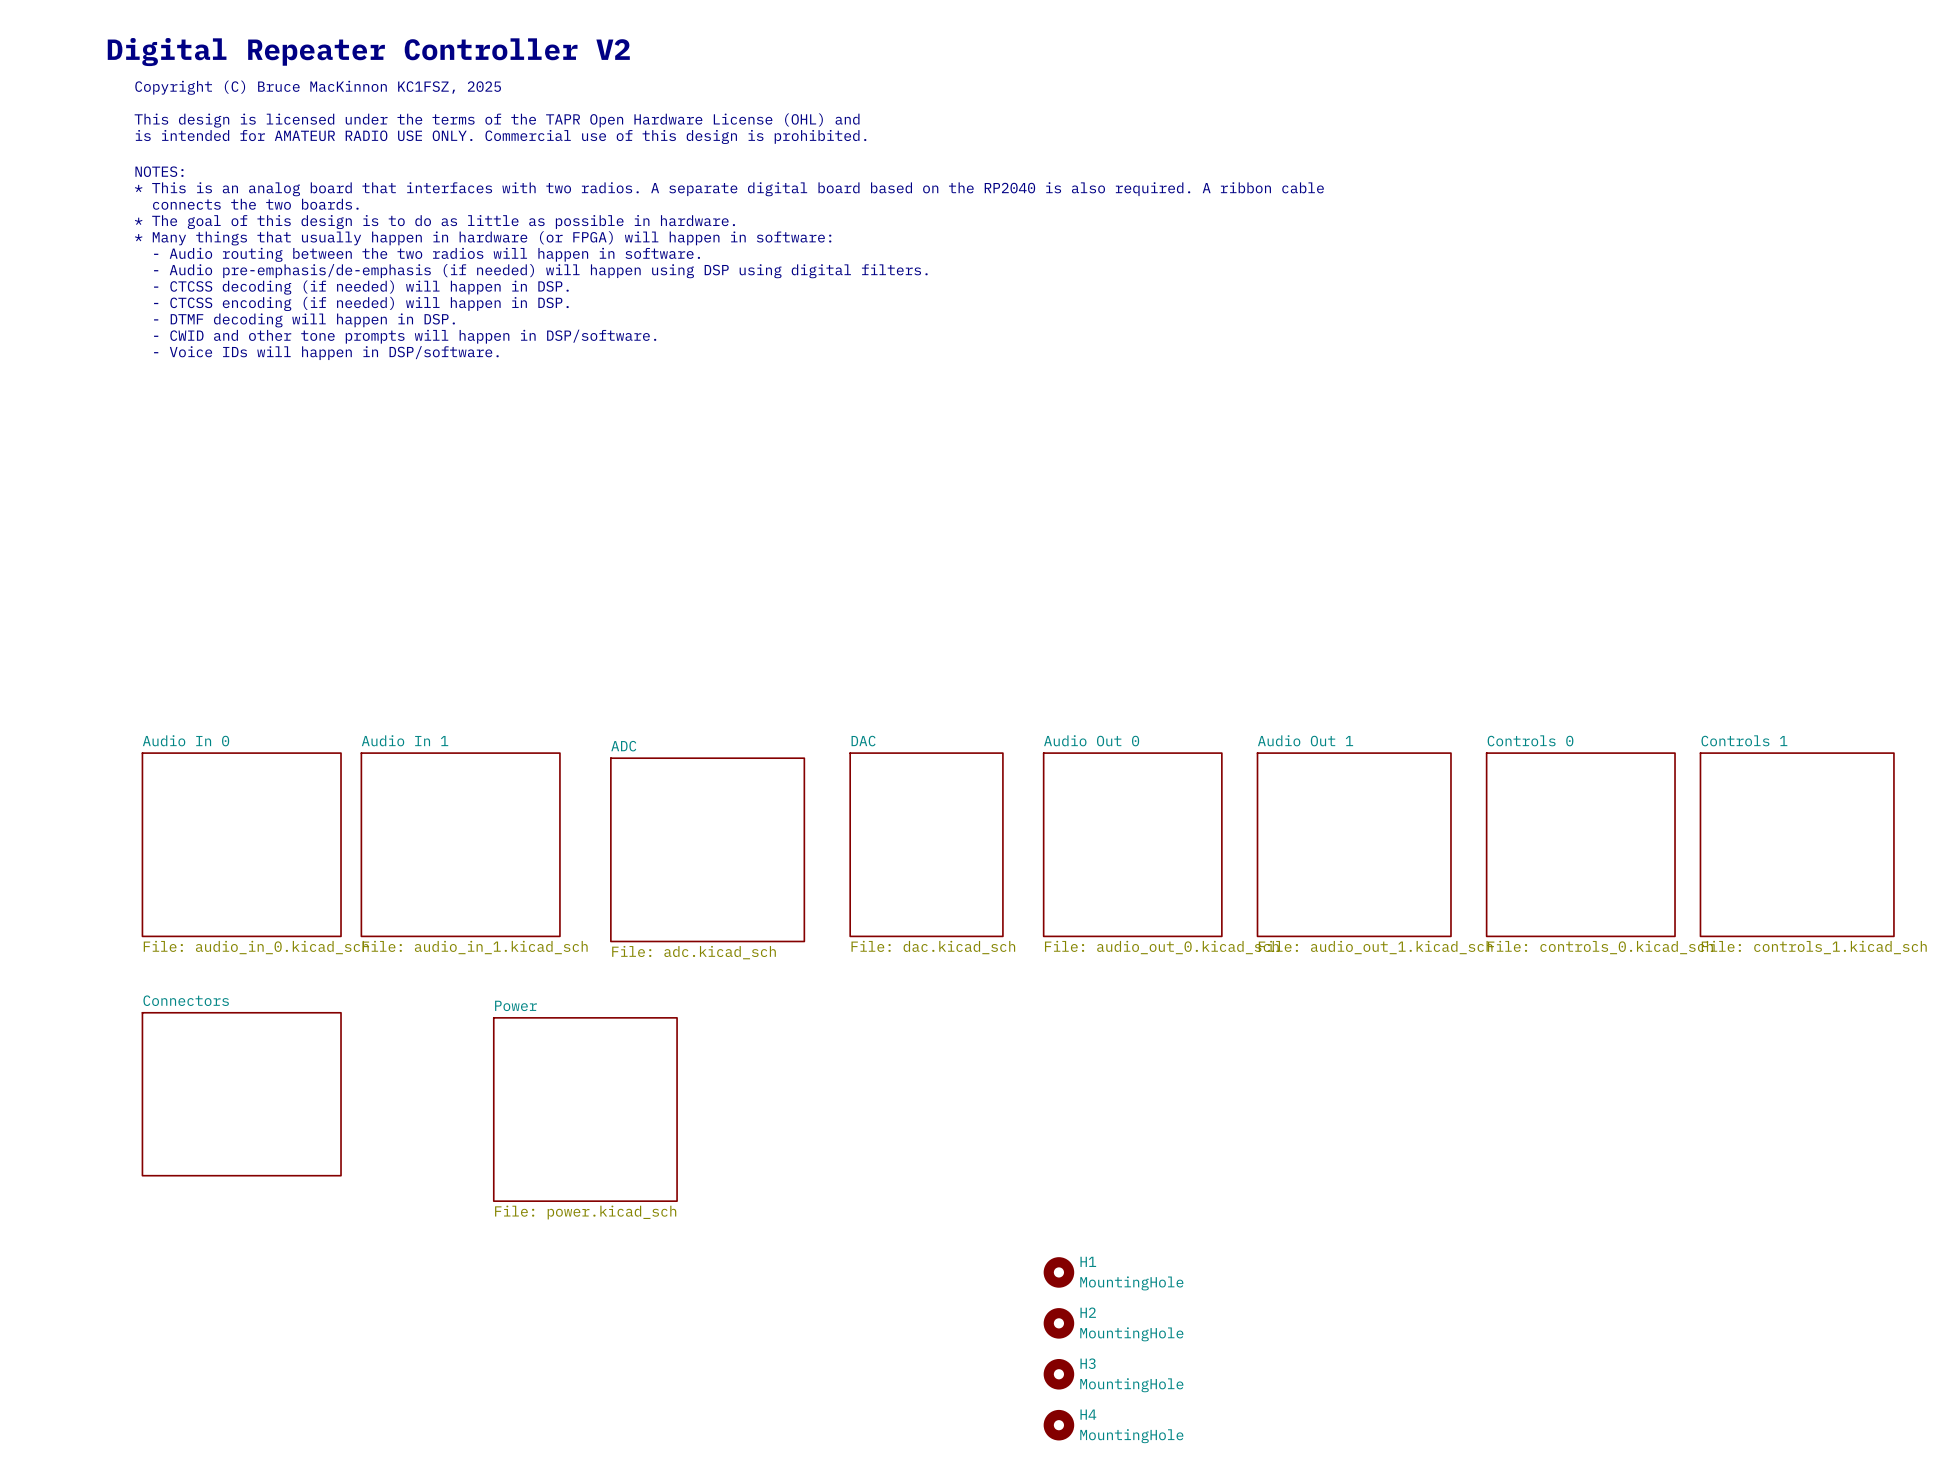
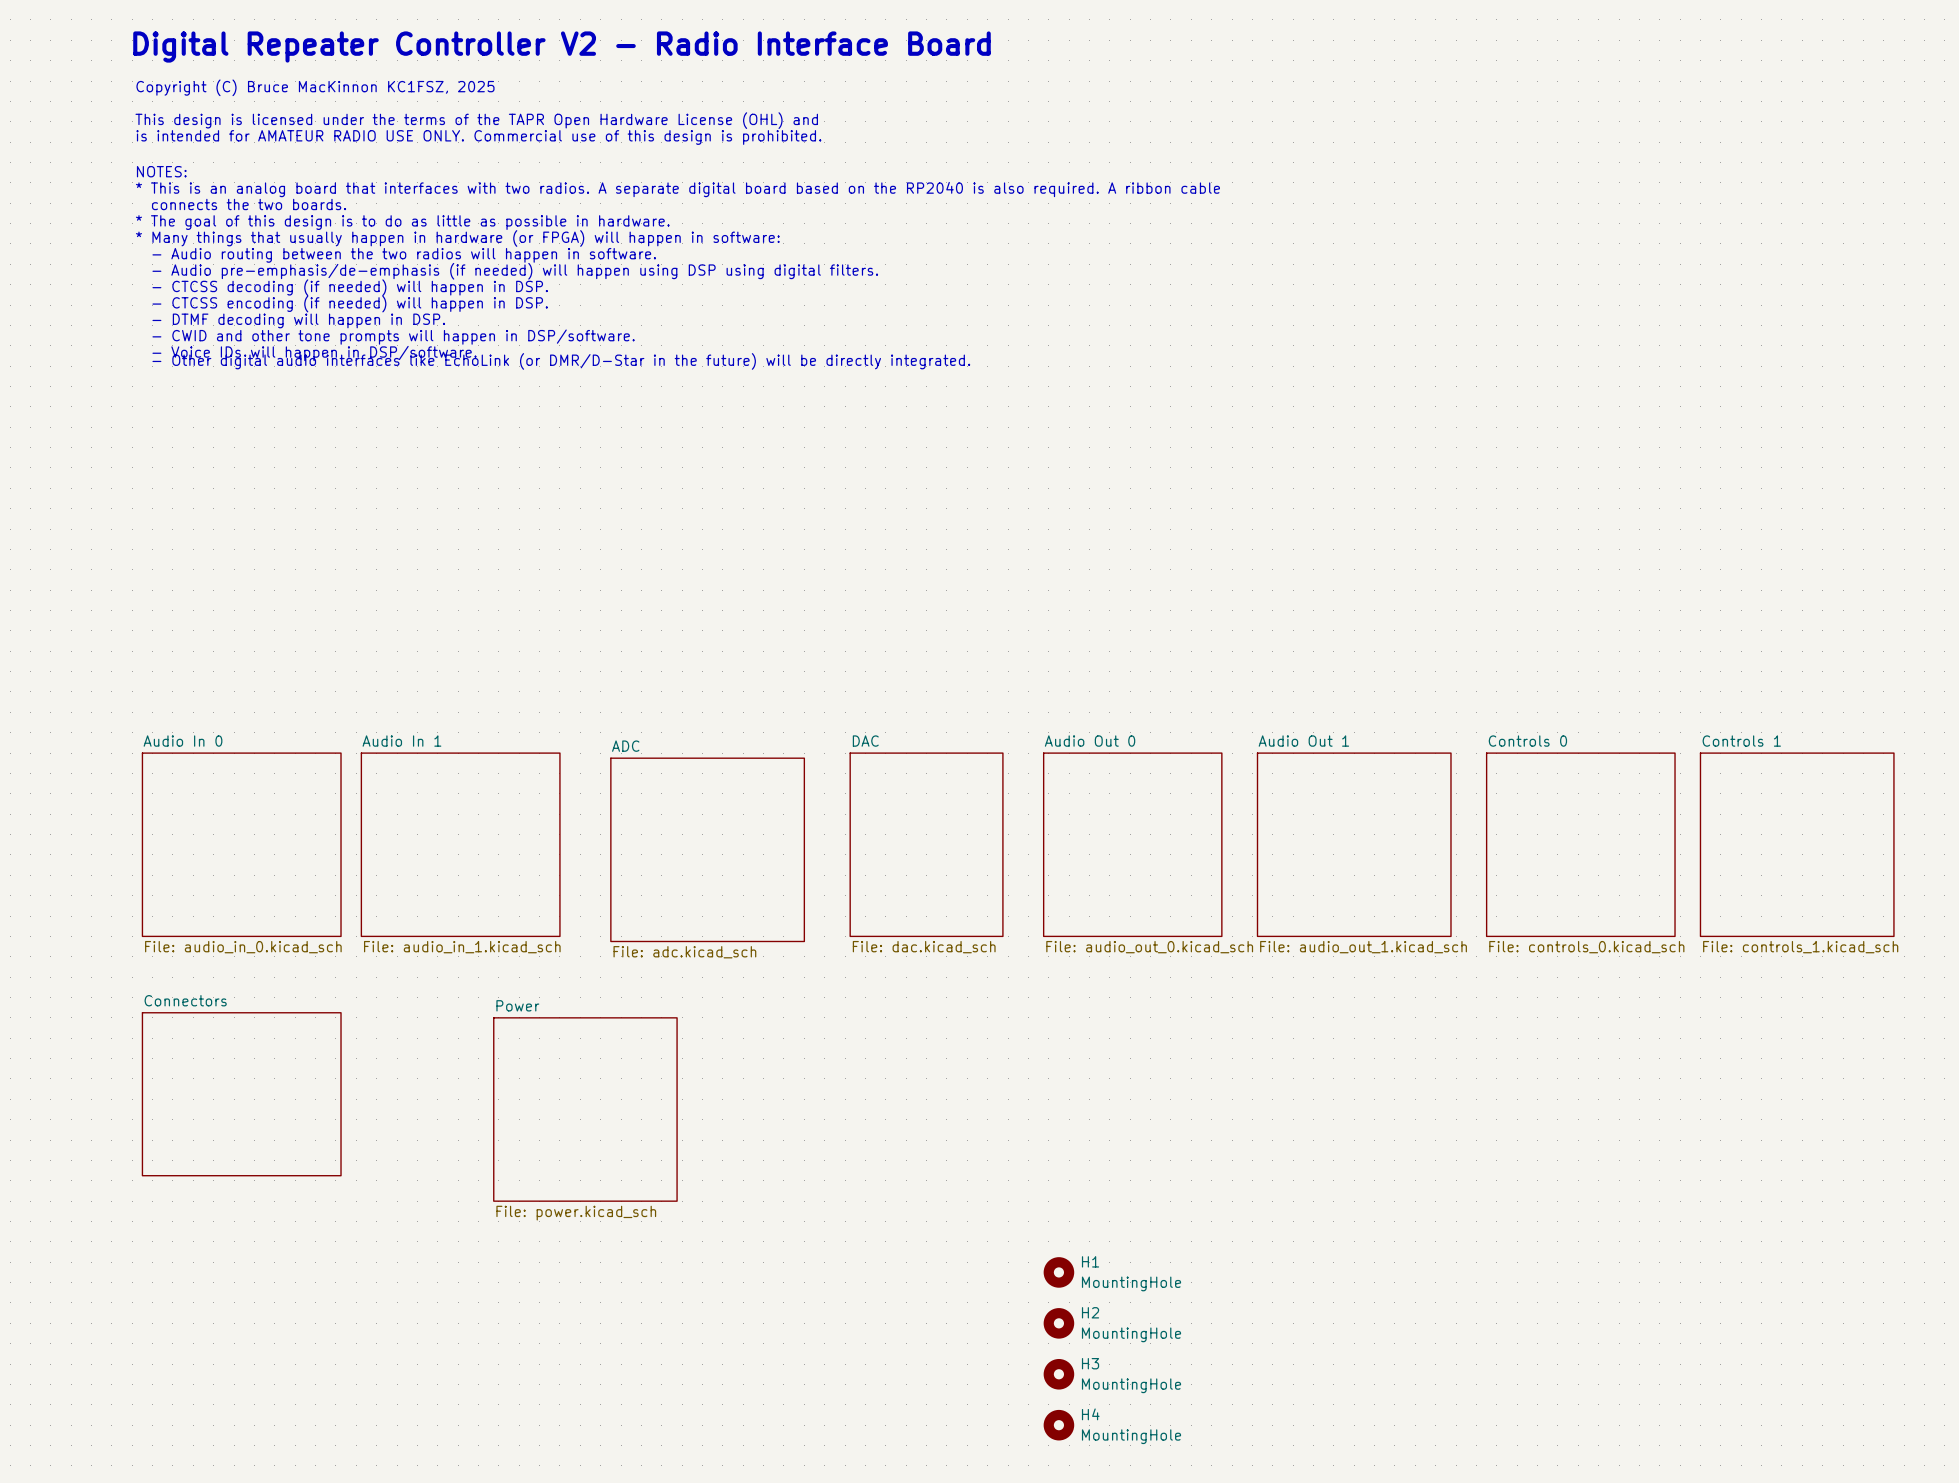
text: Digital Repeater Controller V2 (368, 52) -> Digital Repeater Controller V2 - Radio Interface Board (561, 47)
text: none -> - Other digital audio interfaces like EchoLink (or DMR/D-Star in the future) will be directly integrated. (561, 361)

